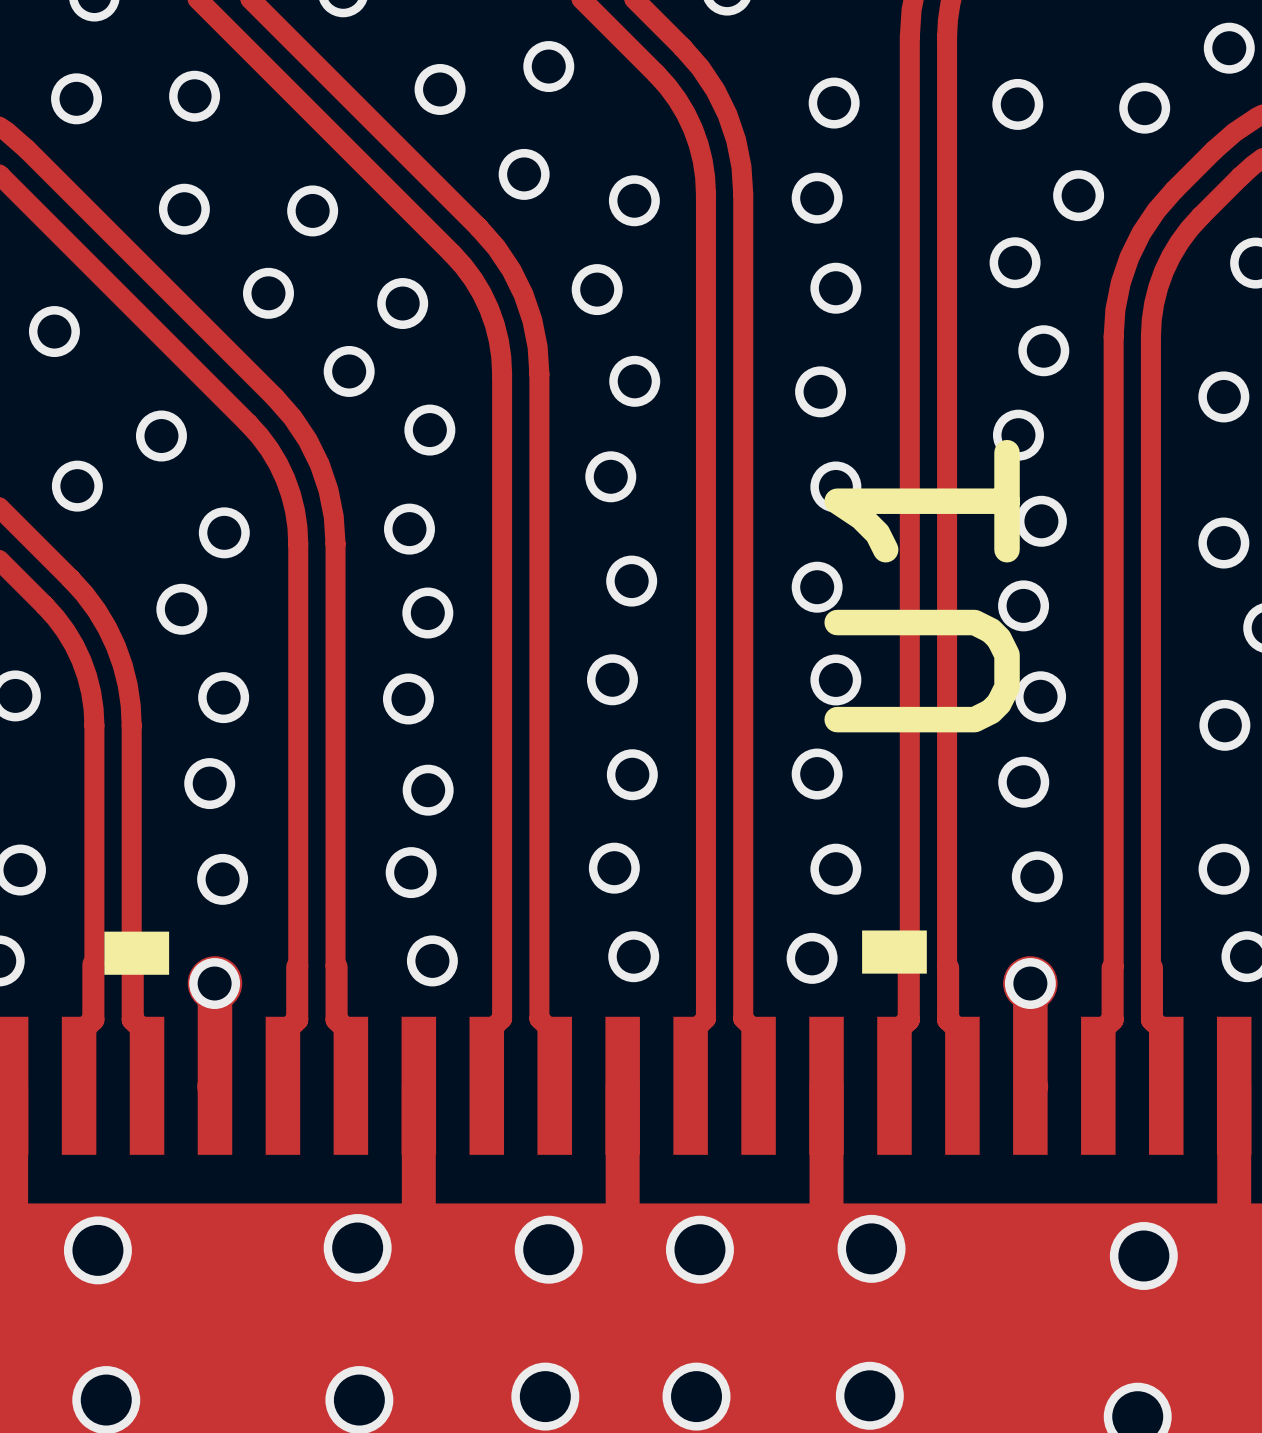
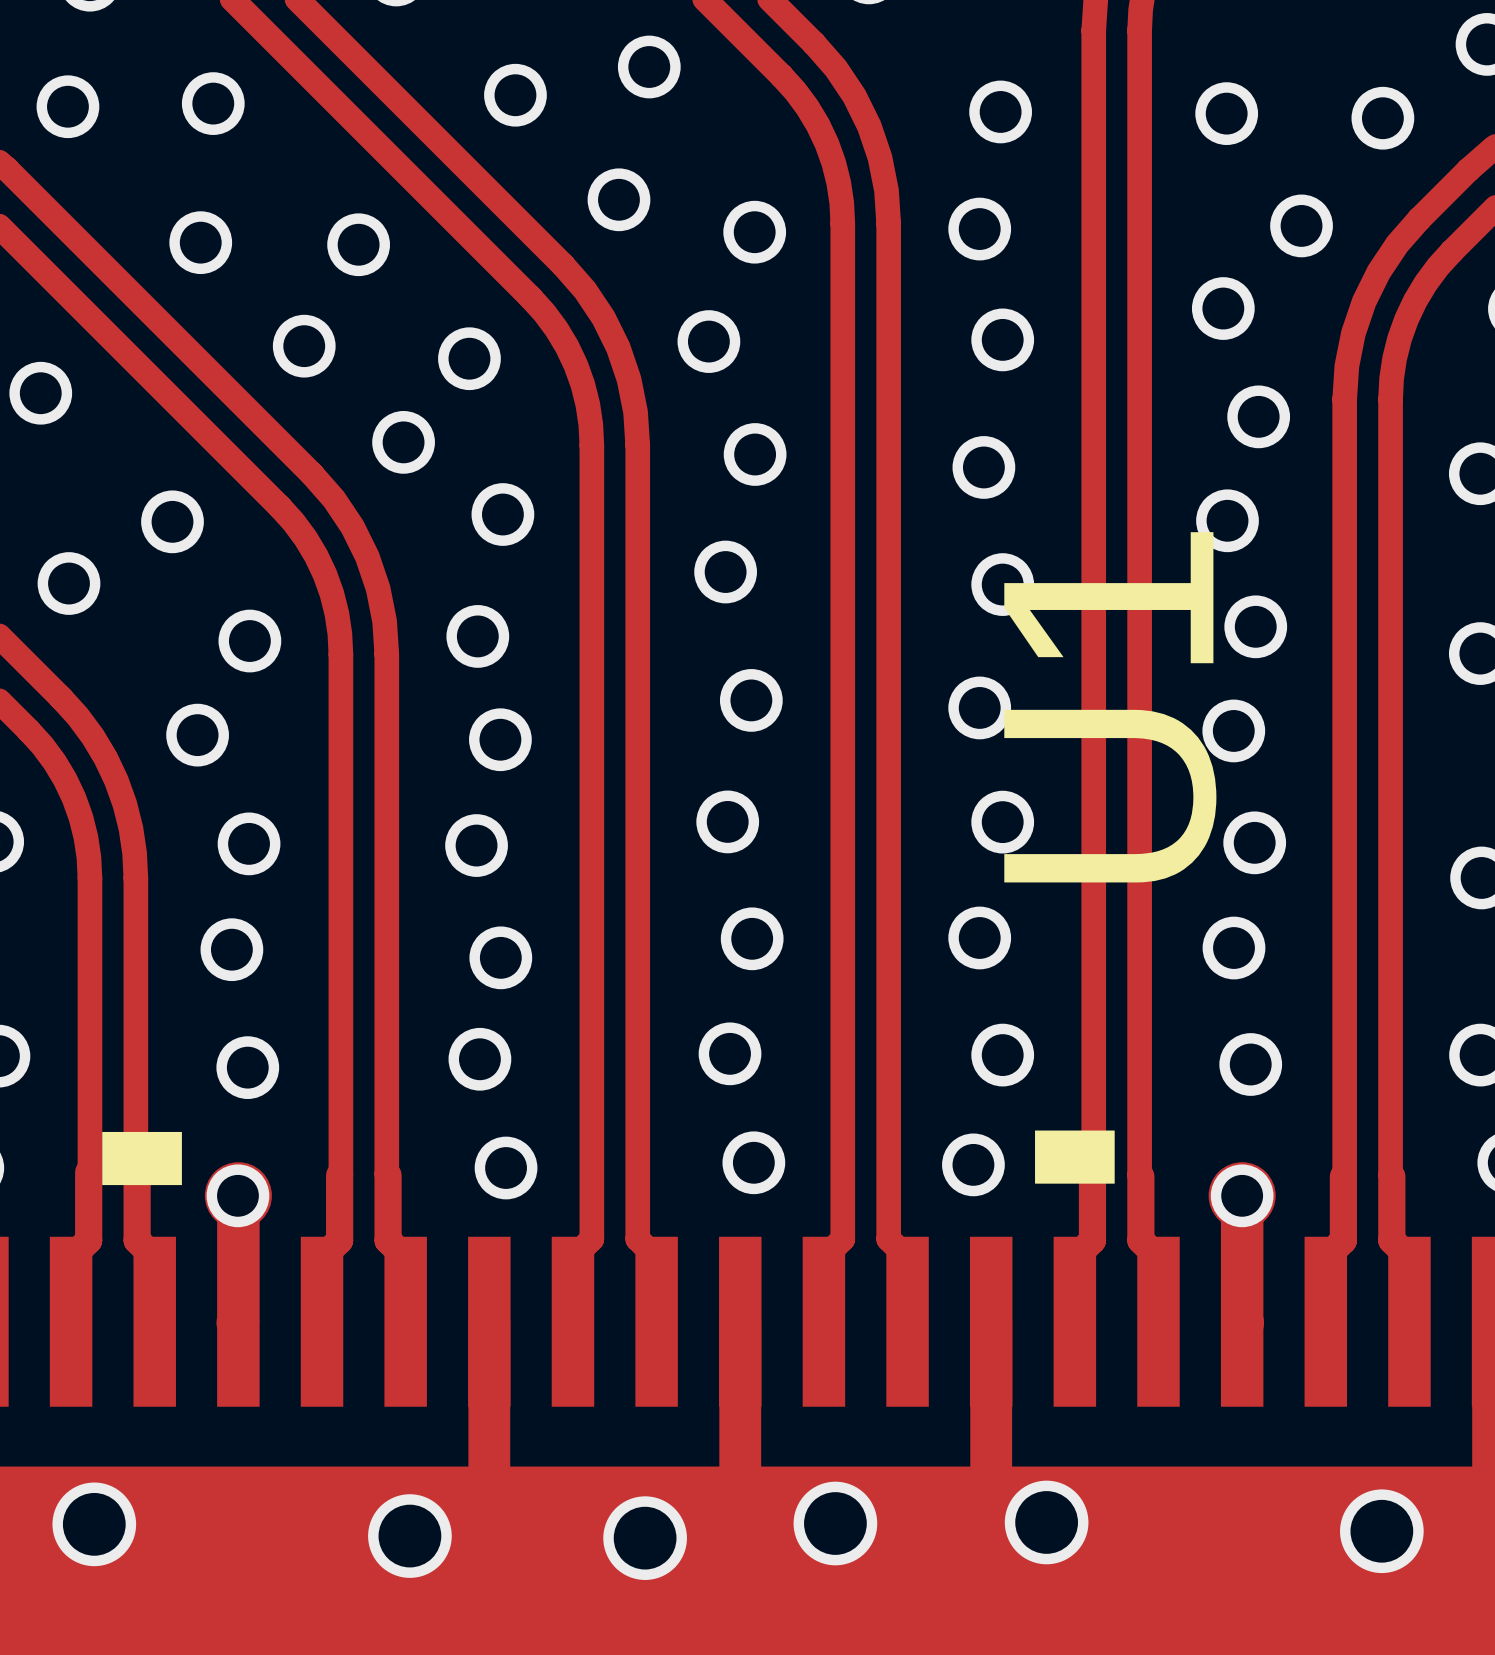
via position: (357, 1248) -> (409, 1536)
via position: (548, 1249) -> (645, 1538)

